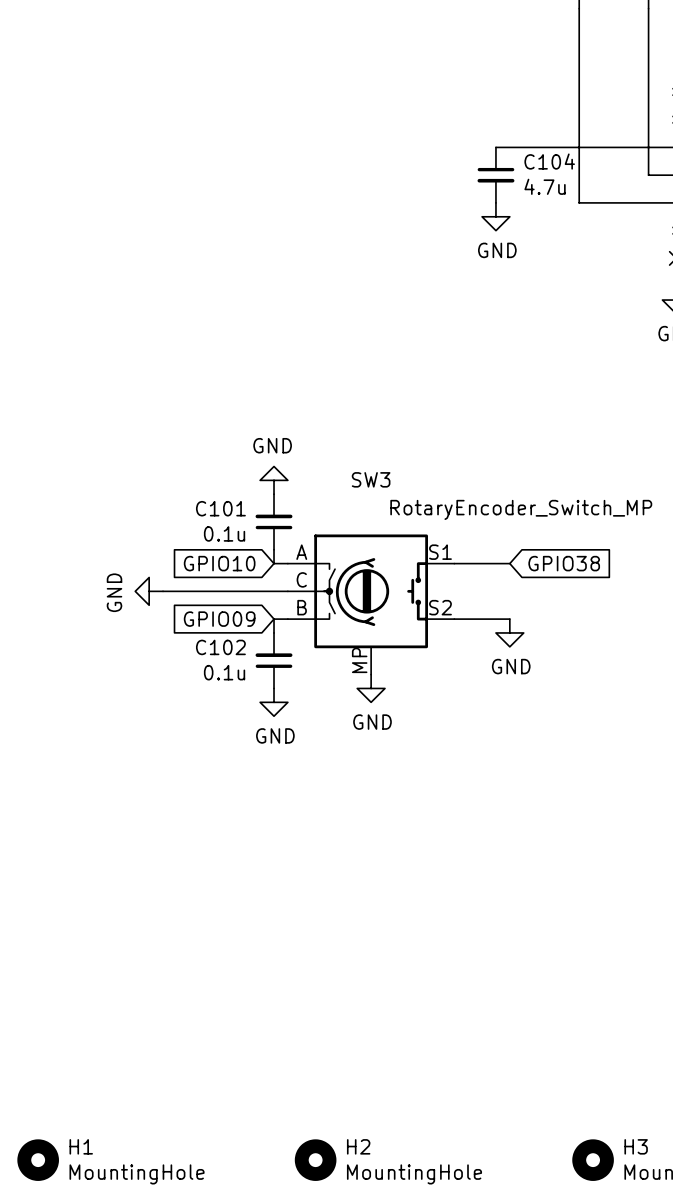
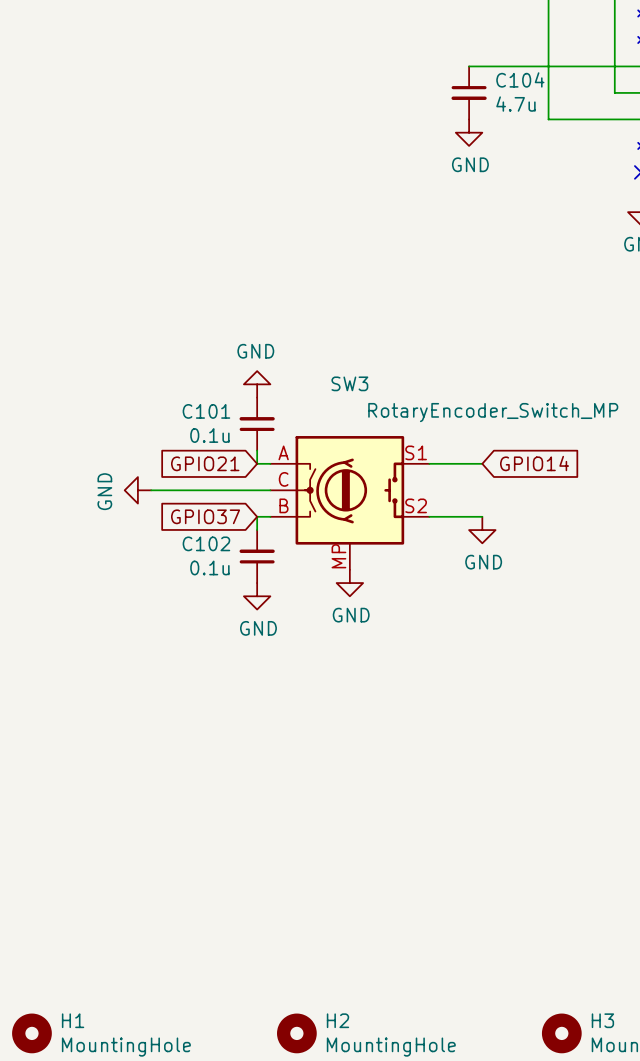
global label: GPIO10 (219, 563) -> GPIO21 (205, 463)
global label: GPIO38 (564, 563) -> GPIO14 (534, 463)
global label: GPIO09 (219, 619) -> GPIO37 (205, 516)

